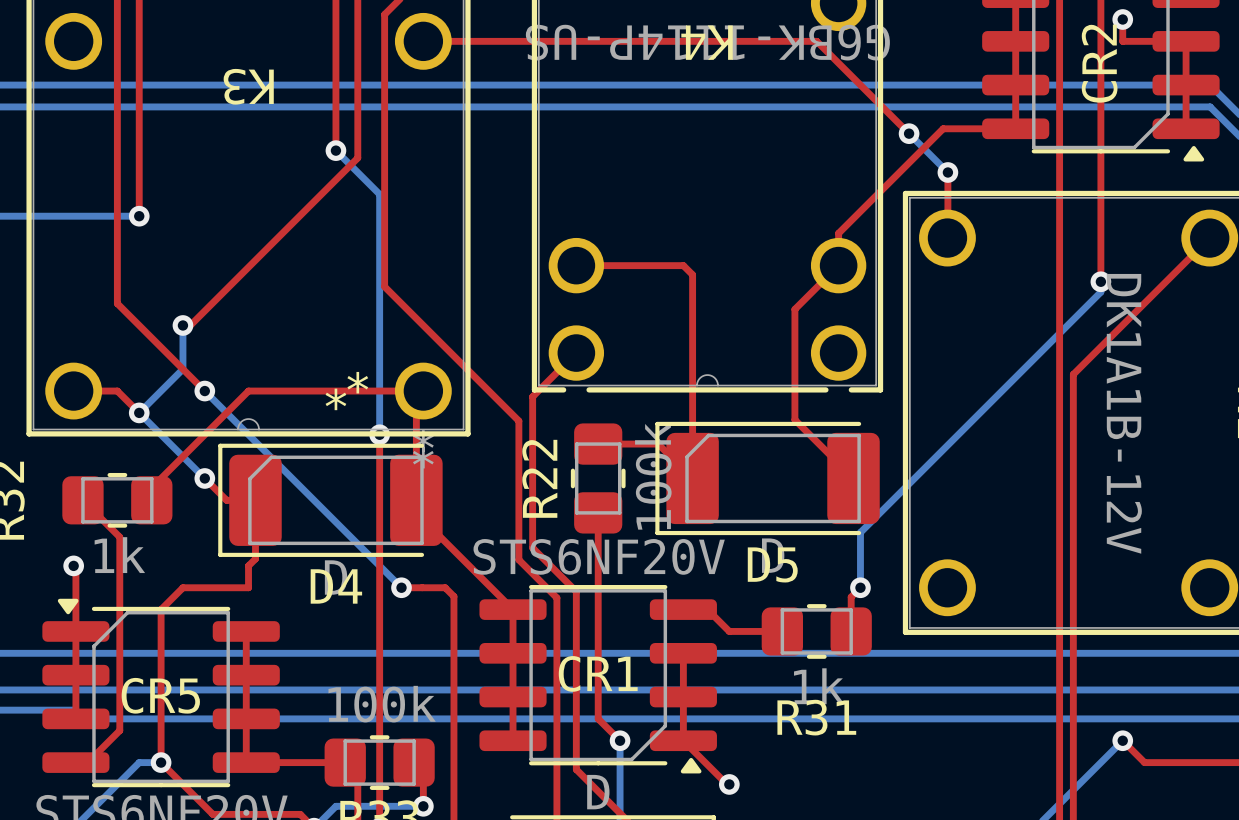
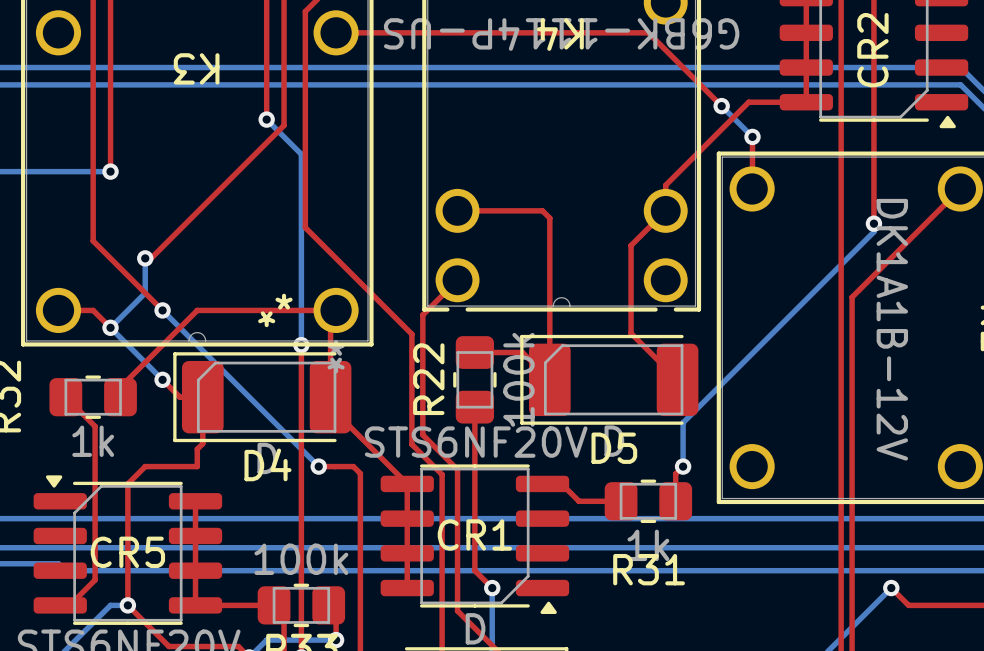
top track: (1122, 19) (1122, 41) (1186, 41) (1186, 128) -> none
via: (1122, 19) -> none
top track: (73, 565) (75, 568) (75, 718) -> none
via: (73, 565) -> none
top track: (683, 653) (683, 740) (727, 784) (729, 784) -> none
via: (729, 784) -> none

